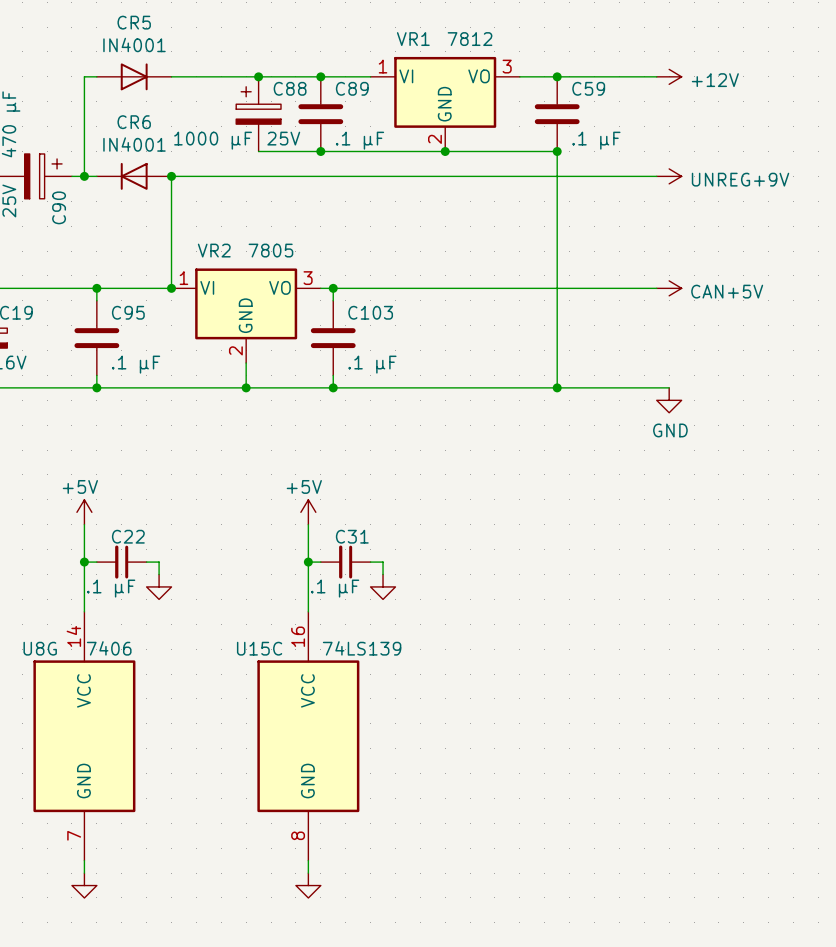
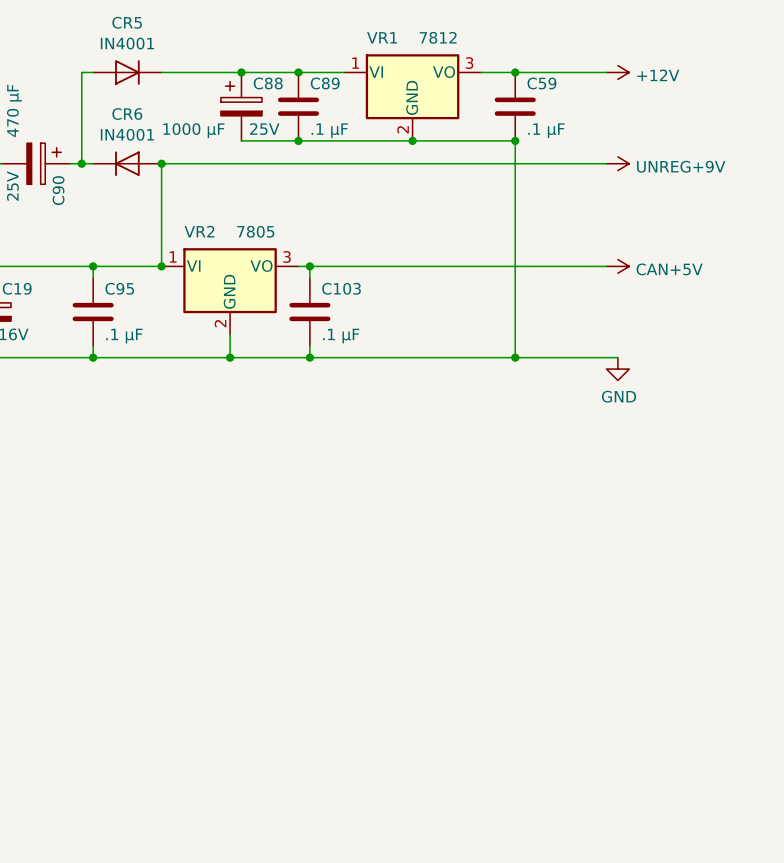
power symbol: +5V (84, 512) -> none
power symbol: +5V (308, 512) -> none
wire: (84, 524) (84, 611) -> none
wire: (308, 524) (308, 611) -> none
wire: (84, 562) (96, 562) -> none
junction: (84, 562) -> none
C22: .1 μF (121, 562) -> none
wire: (146, 562) (159, 562) (159, 574) -> none
wire: (308, 562) (320, 562) -> none
junction: (308, 562) -> none
C31: .1 μF (345, 562) -> none
wire: (370, 562) (383, 562) (383, 574) -> none
power symbol: (159, 586) -> none
power symbol: (383, 586) -> none
U8G: 7406 (84, 736) -> none
U15C: 74LS139 (308, 736) -> none
wire: (84, 860) (84, 873) -> none
wire: (308, 860) (308, 873) -> none
power symbol: (84, 885) -> none
power symbol: (308, 885) -> none

